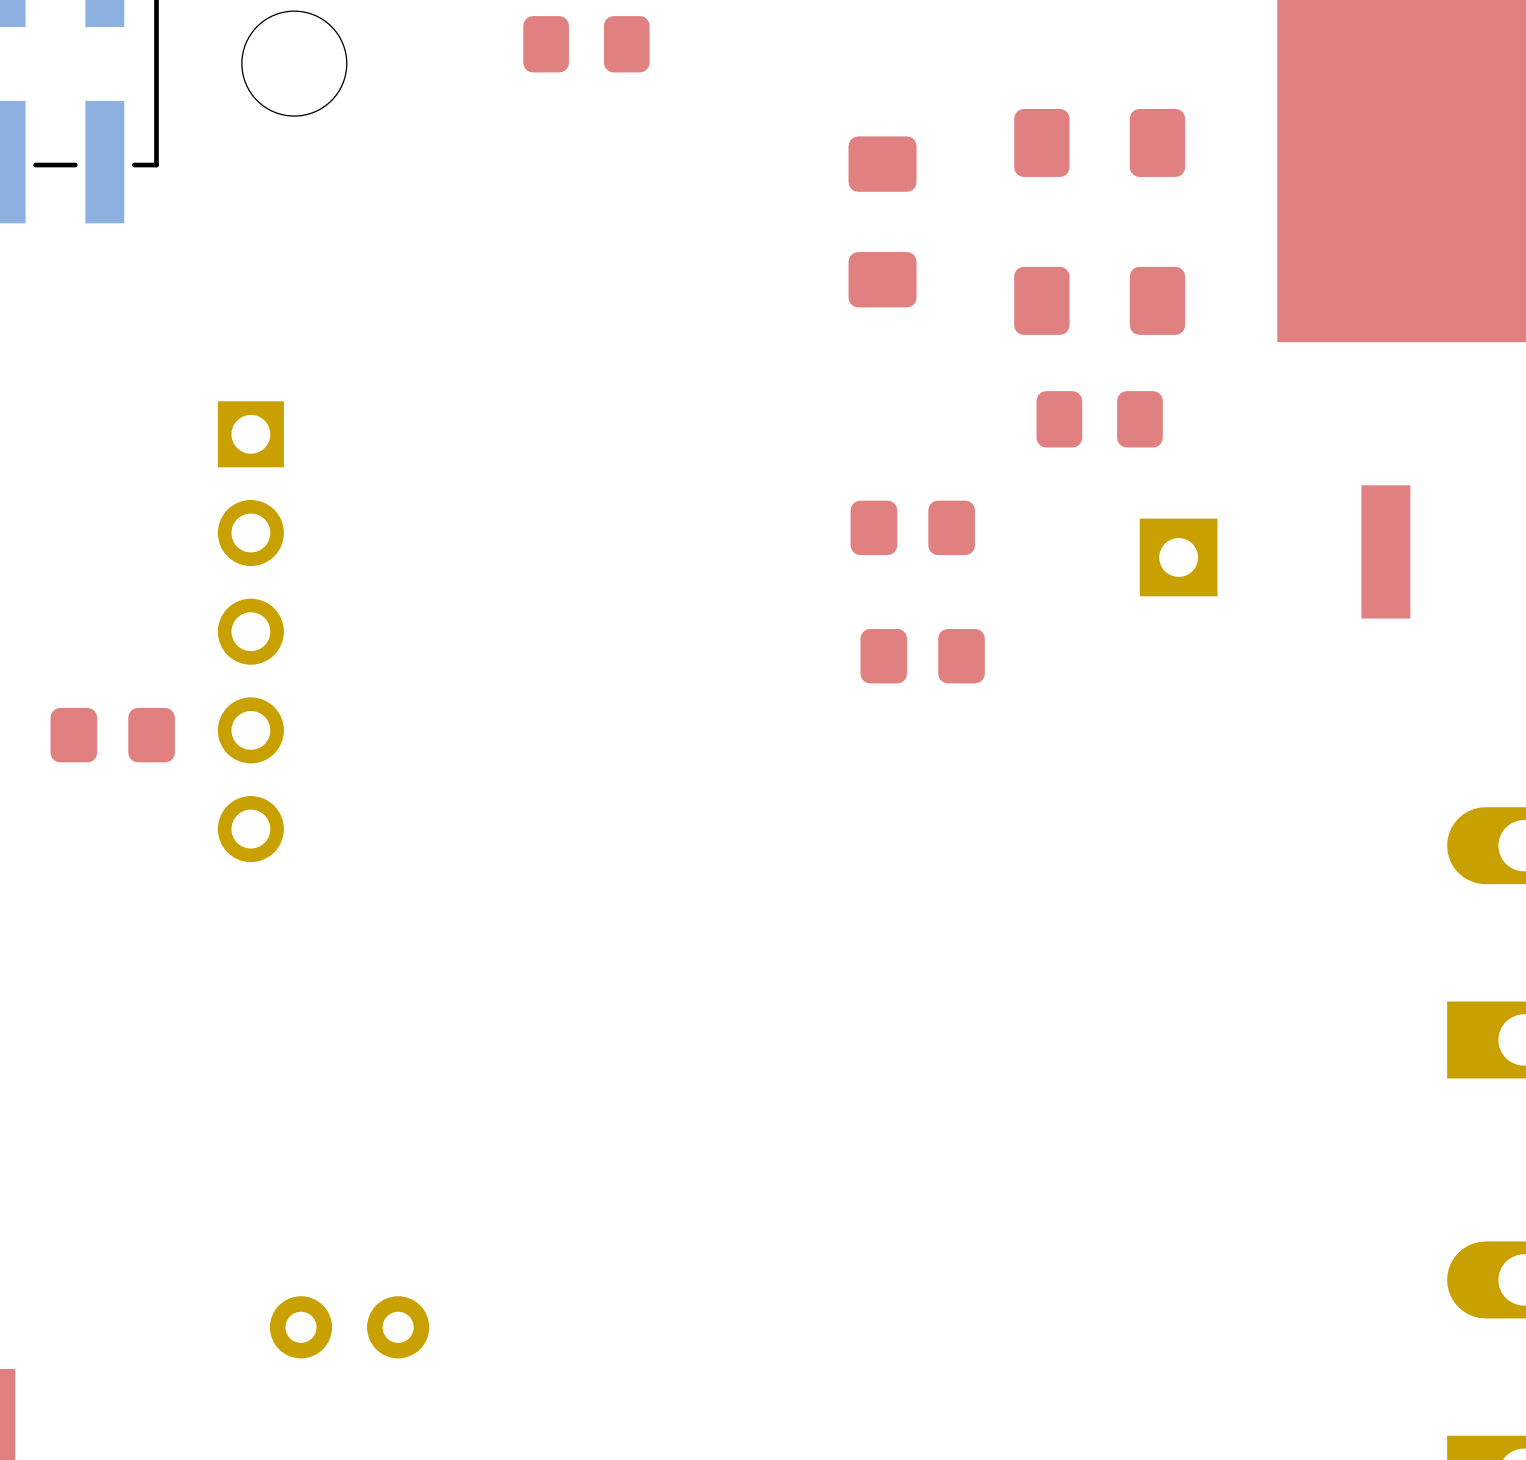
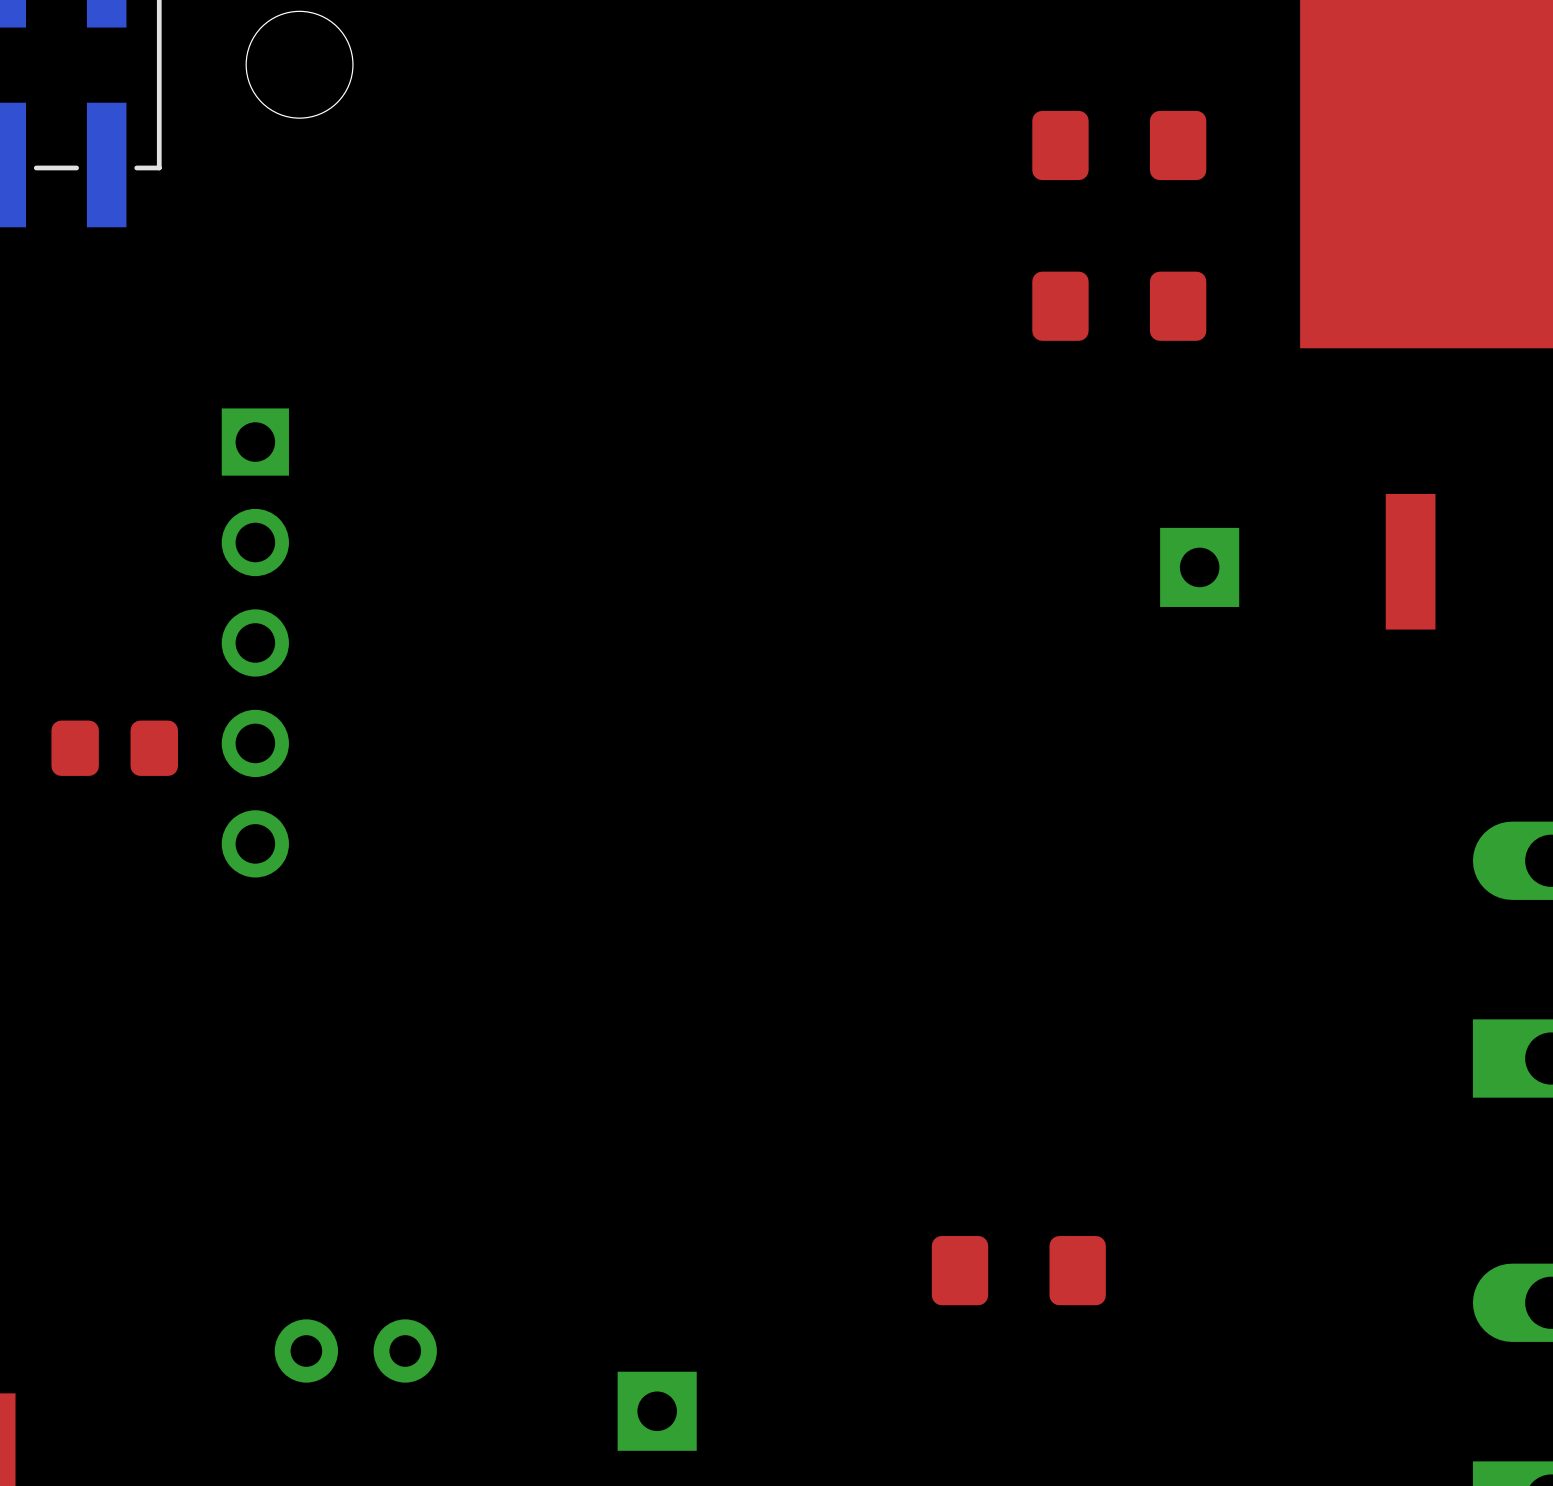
part: (586, 44) -> none
part: (882, 221) -> none
part: (1099, 419) -> none
part: (912, 527) -> none
part: (922, 656) -> none
part: none -> (1018, 1270)
part: none -> (657, 1411)

